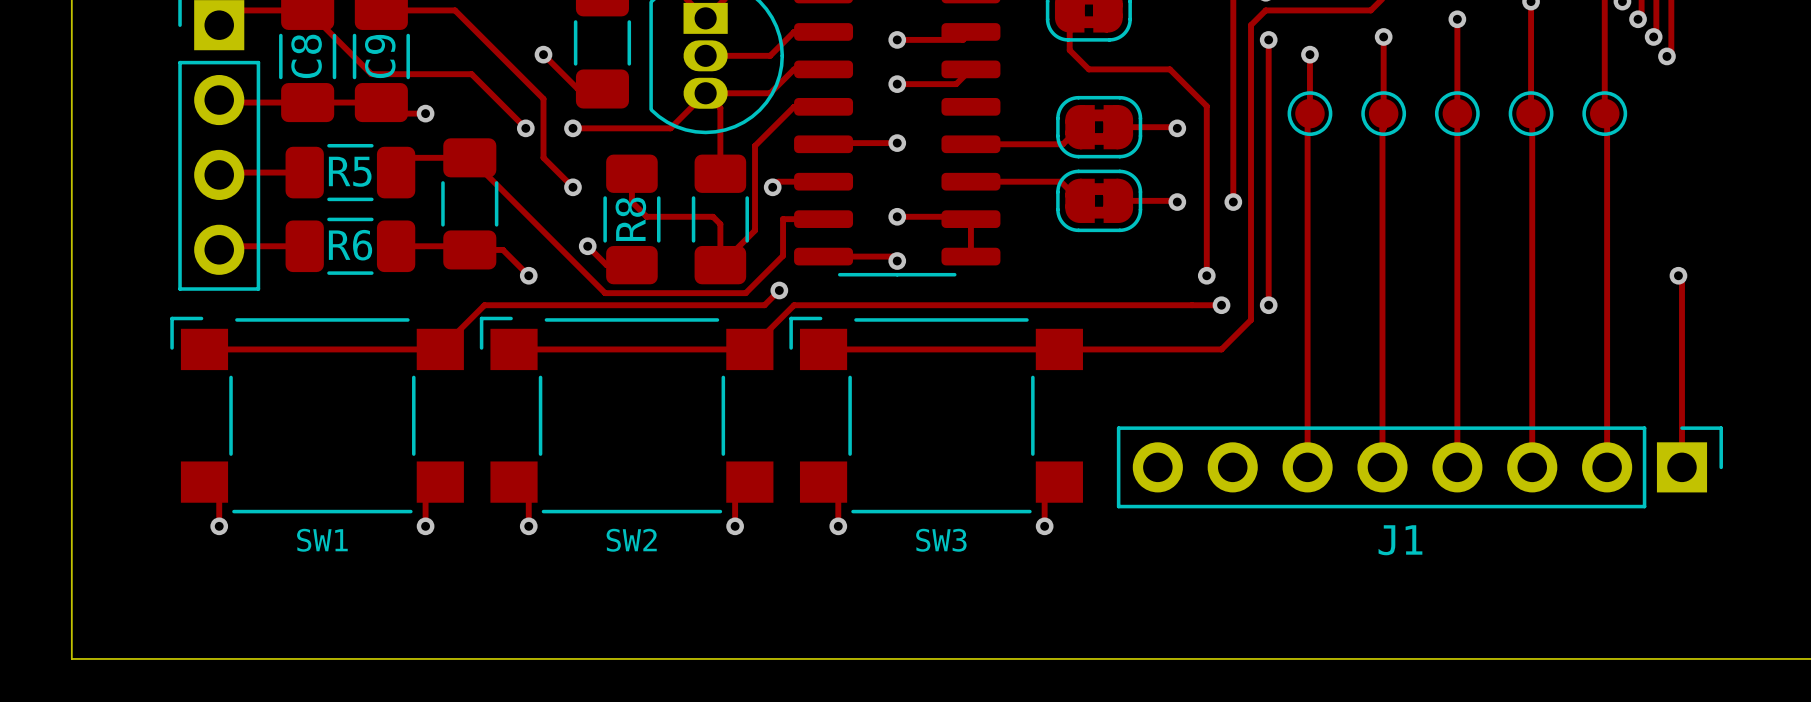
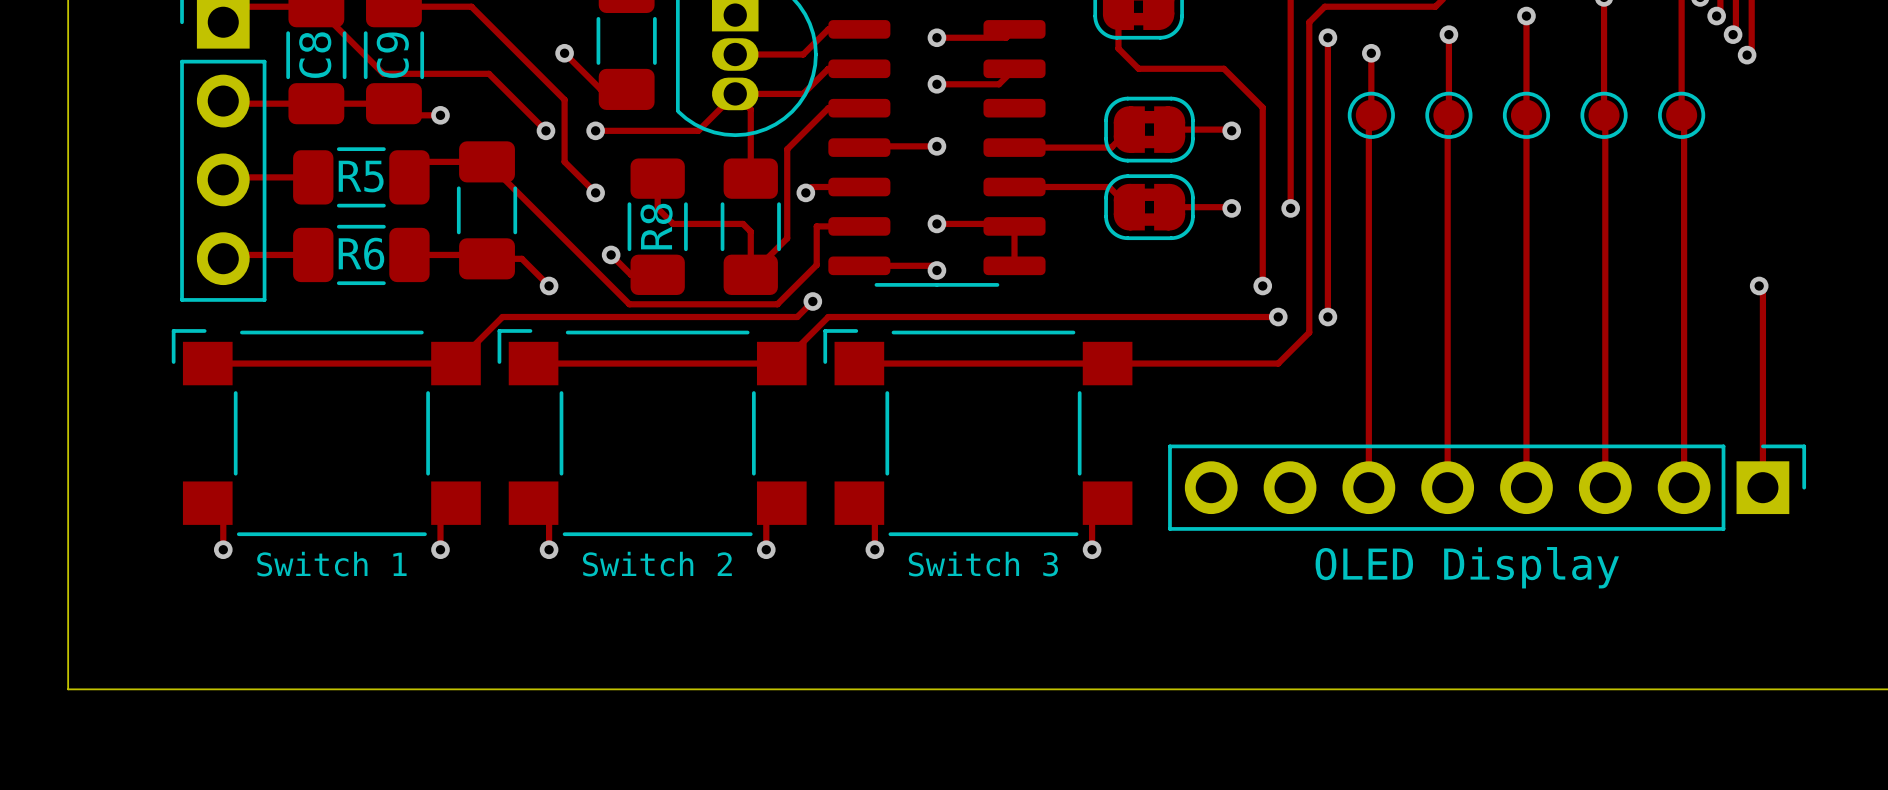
SW1 name: SW1 (322, 540) -> Switch 1 (331, 564)
SW2 name: SW2 (631, 540) -> Switch 2 (657, 564)
SW3 name: SW3 (941, 540) -> Switch 3 (983, 564)
J1 name: J1 (1400, 540) -> OLED Display (1467, 567)

